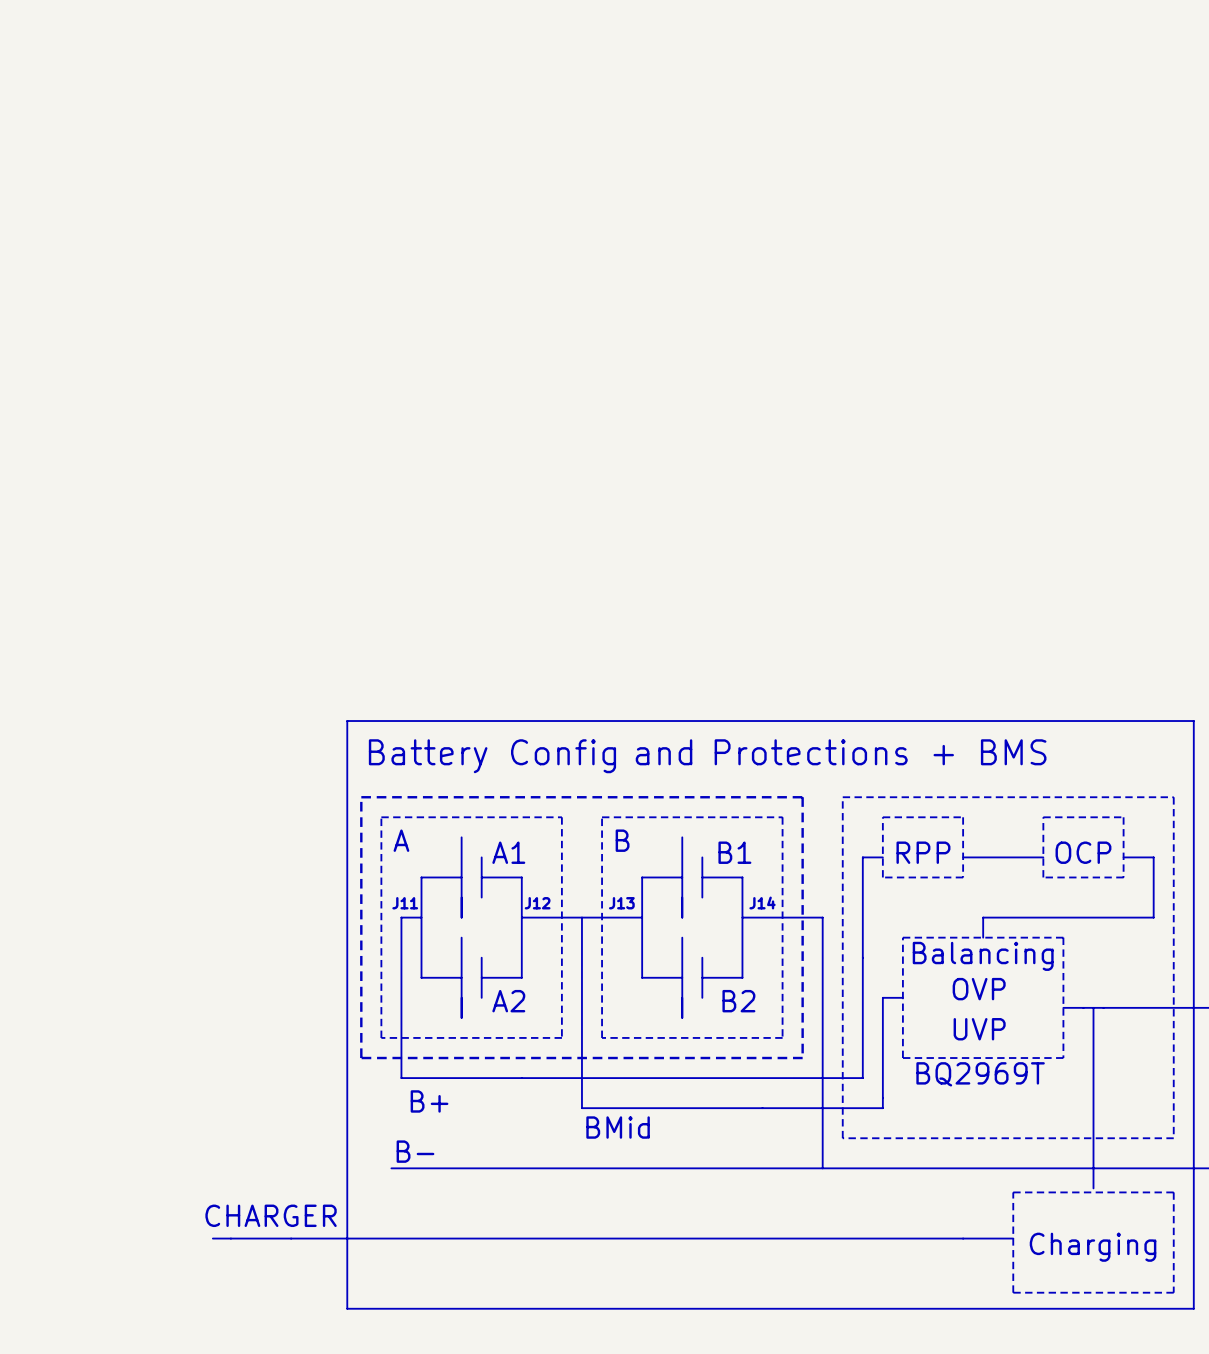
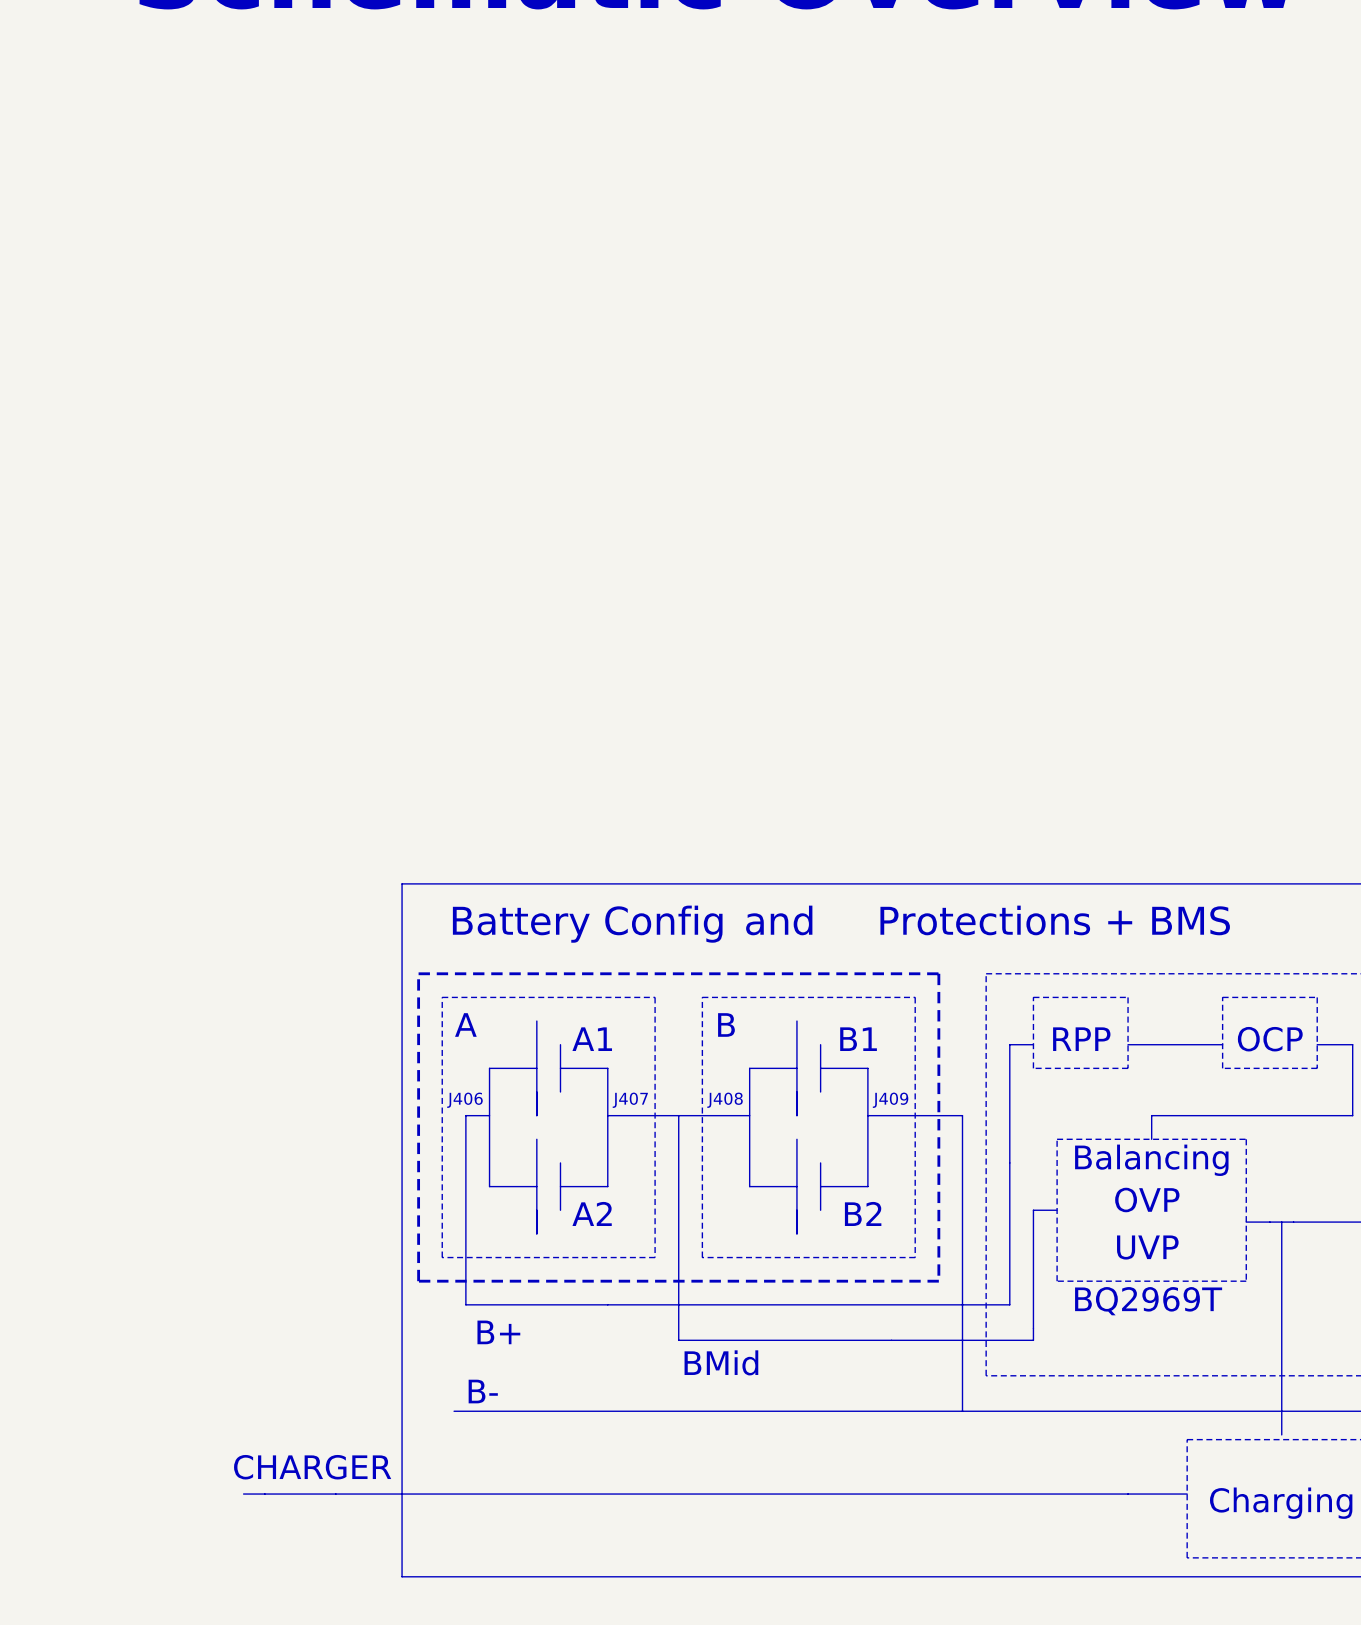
text: J11 (405, 903) -> J406 (464, 1100)
text: J12 (537, 903) -> J407 (630, 1100)
text: J13 (621, 903) -> J408 (725, 1100)
text: J14 (762, 903) -> J409 (890, 1100)

